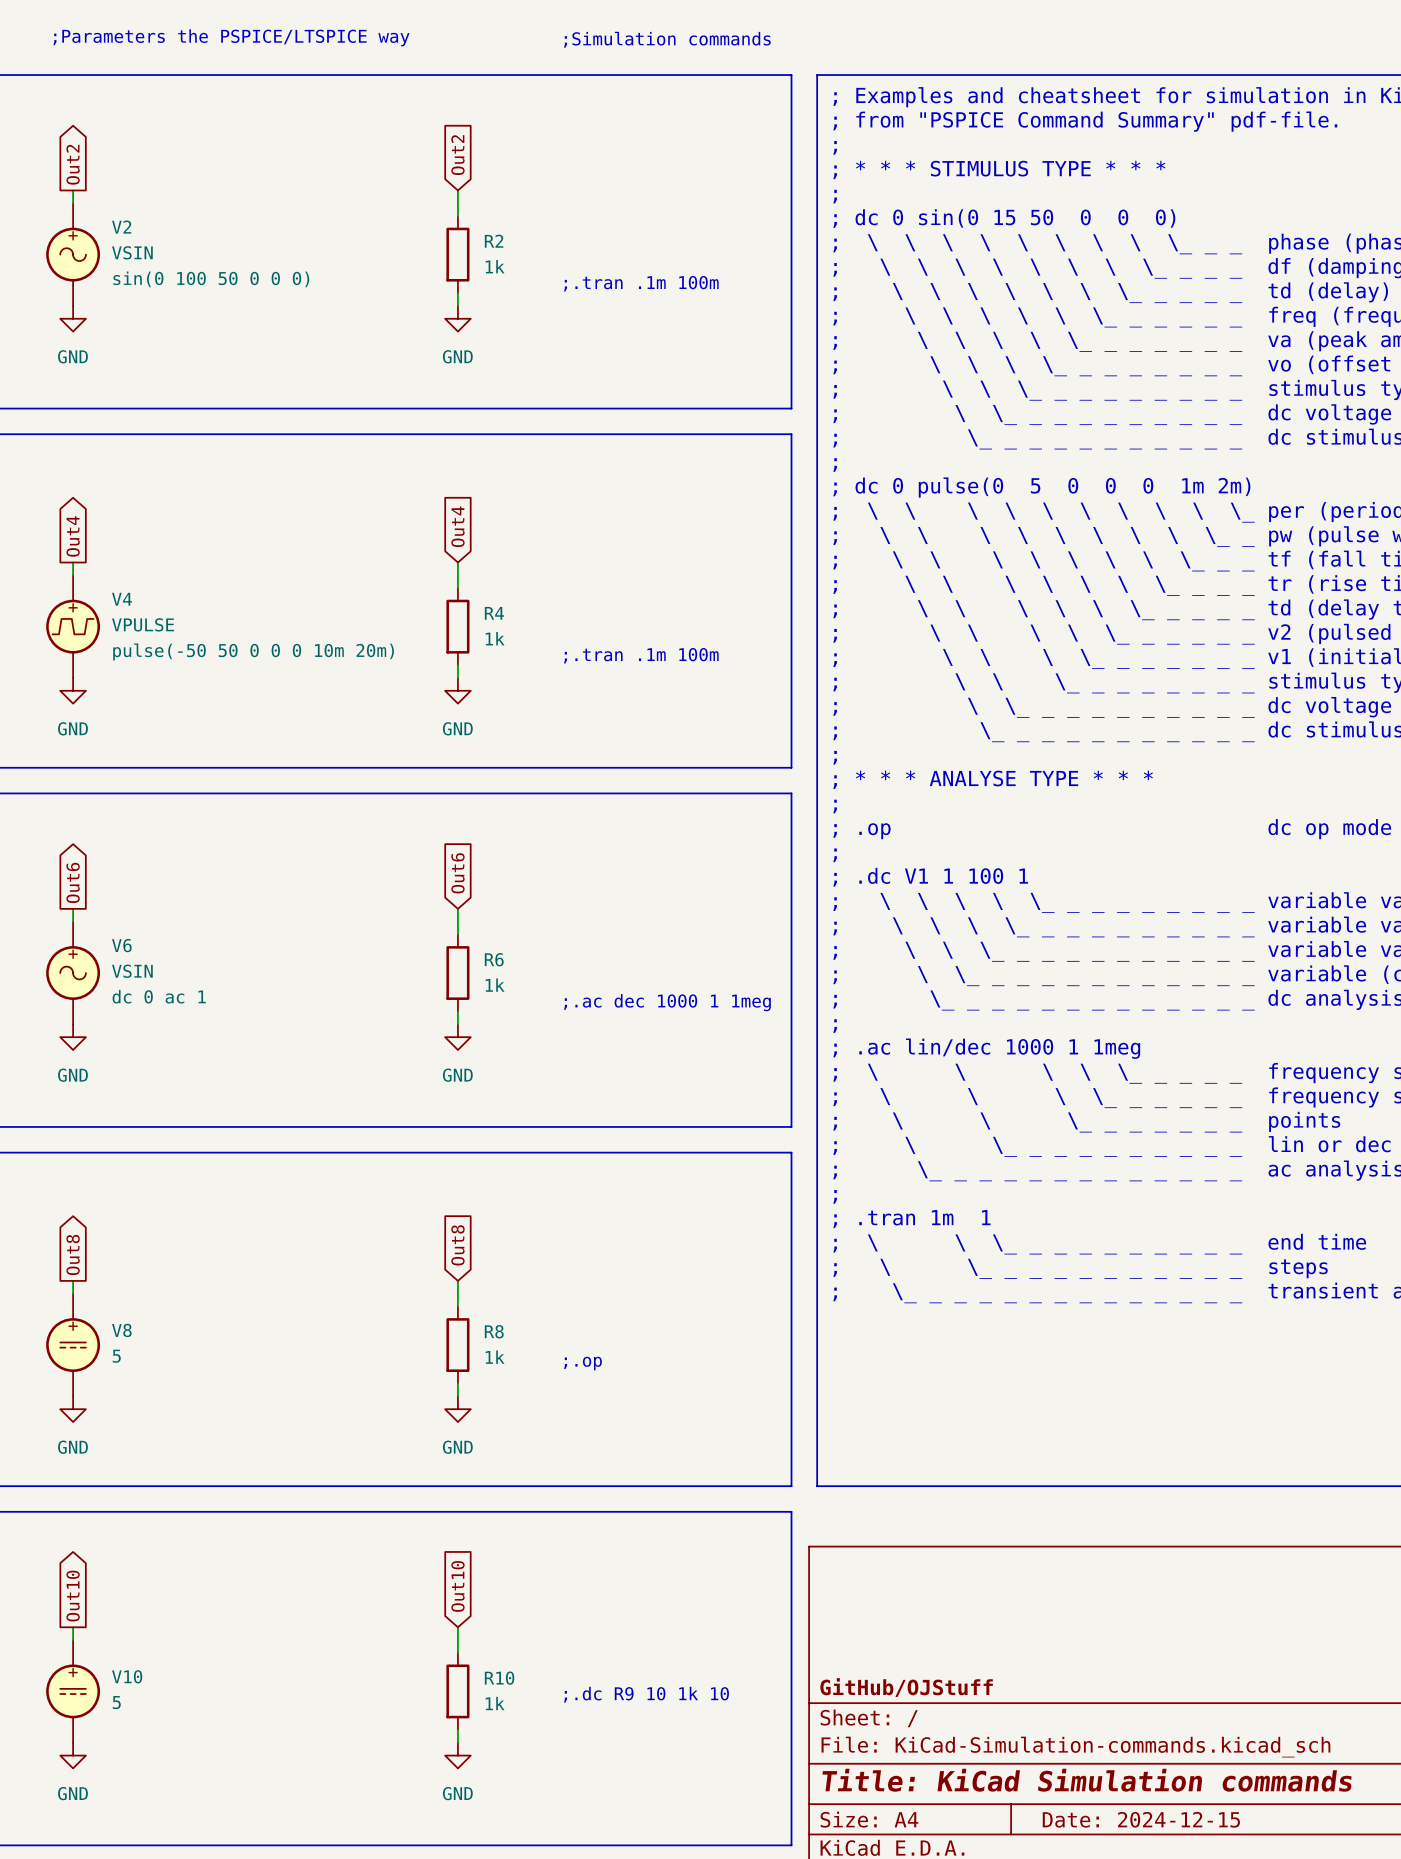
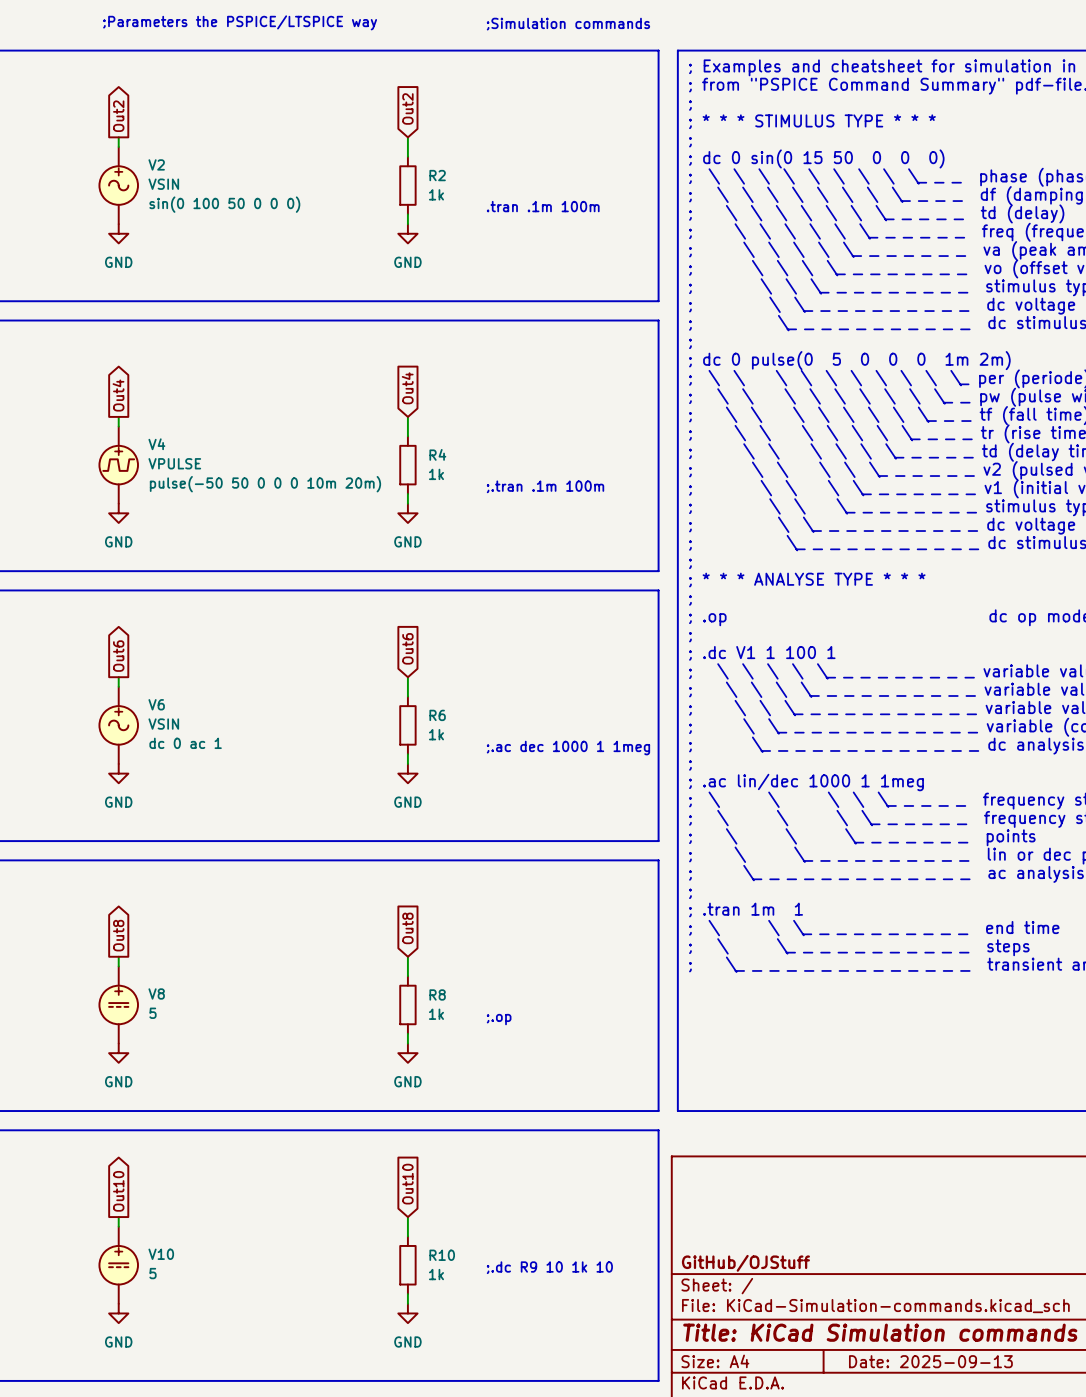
text: ;.tran .1m 100m (641, 283) -> .tran .1m 100m (543, 206)
title block: Date: 2024-12-15 (1141, 1819) -> Date: 2025-09-13 (930, 1361)

